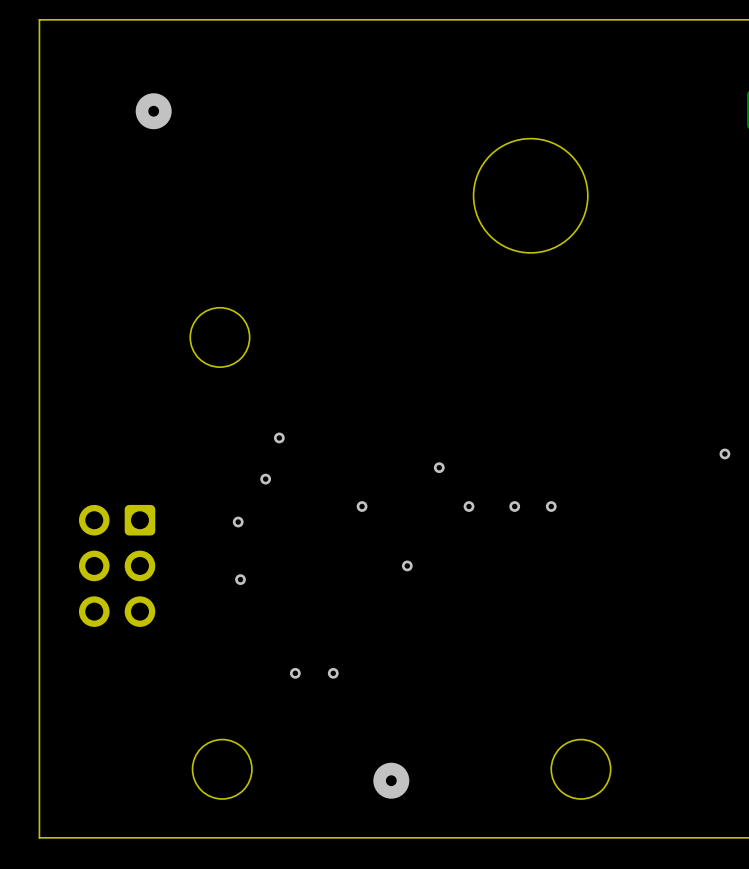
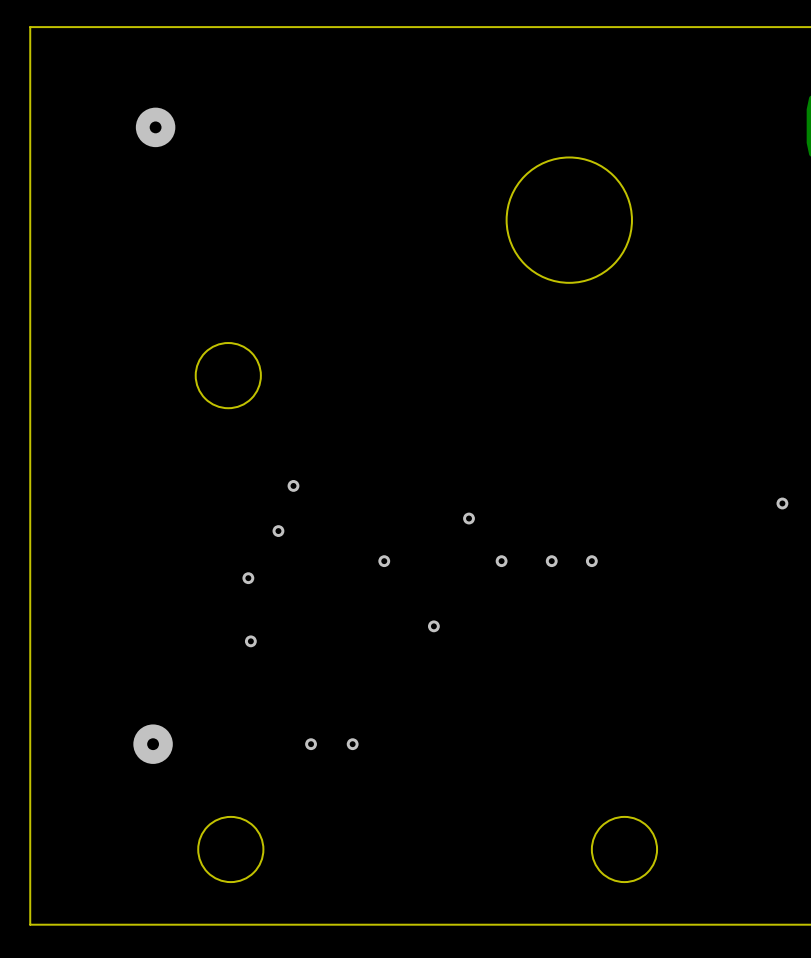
part: (117, 565) -> none
via: none -> (153, 744)
via: (391, 780) -> none

